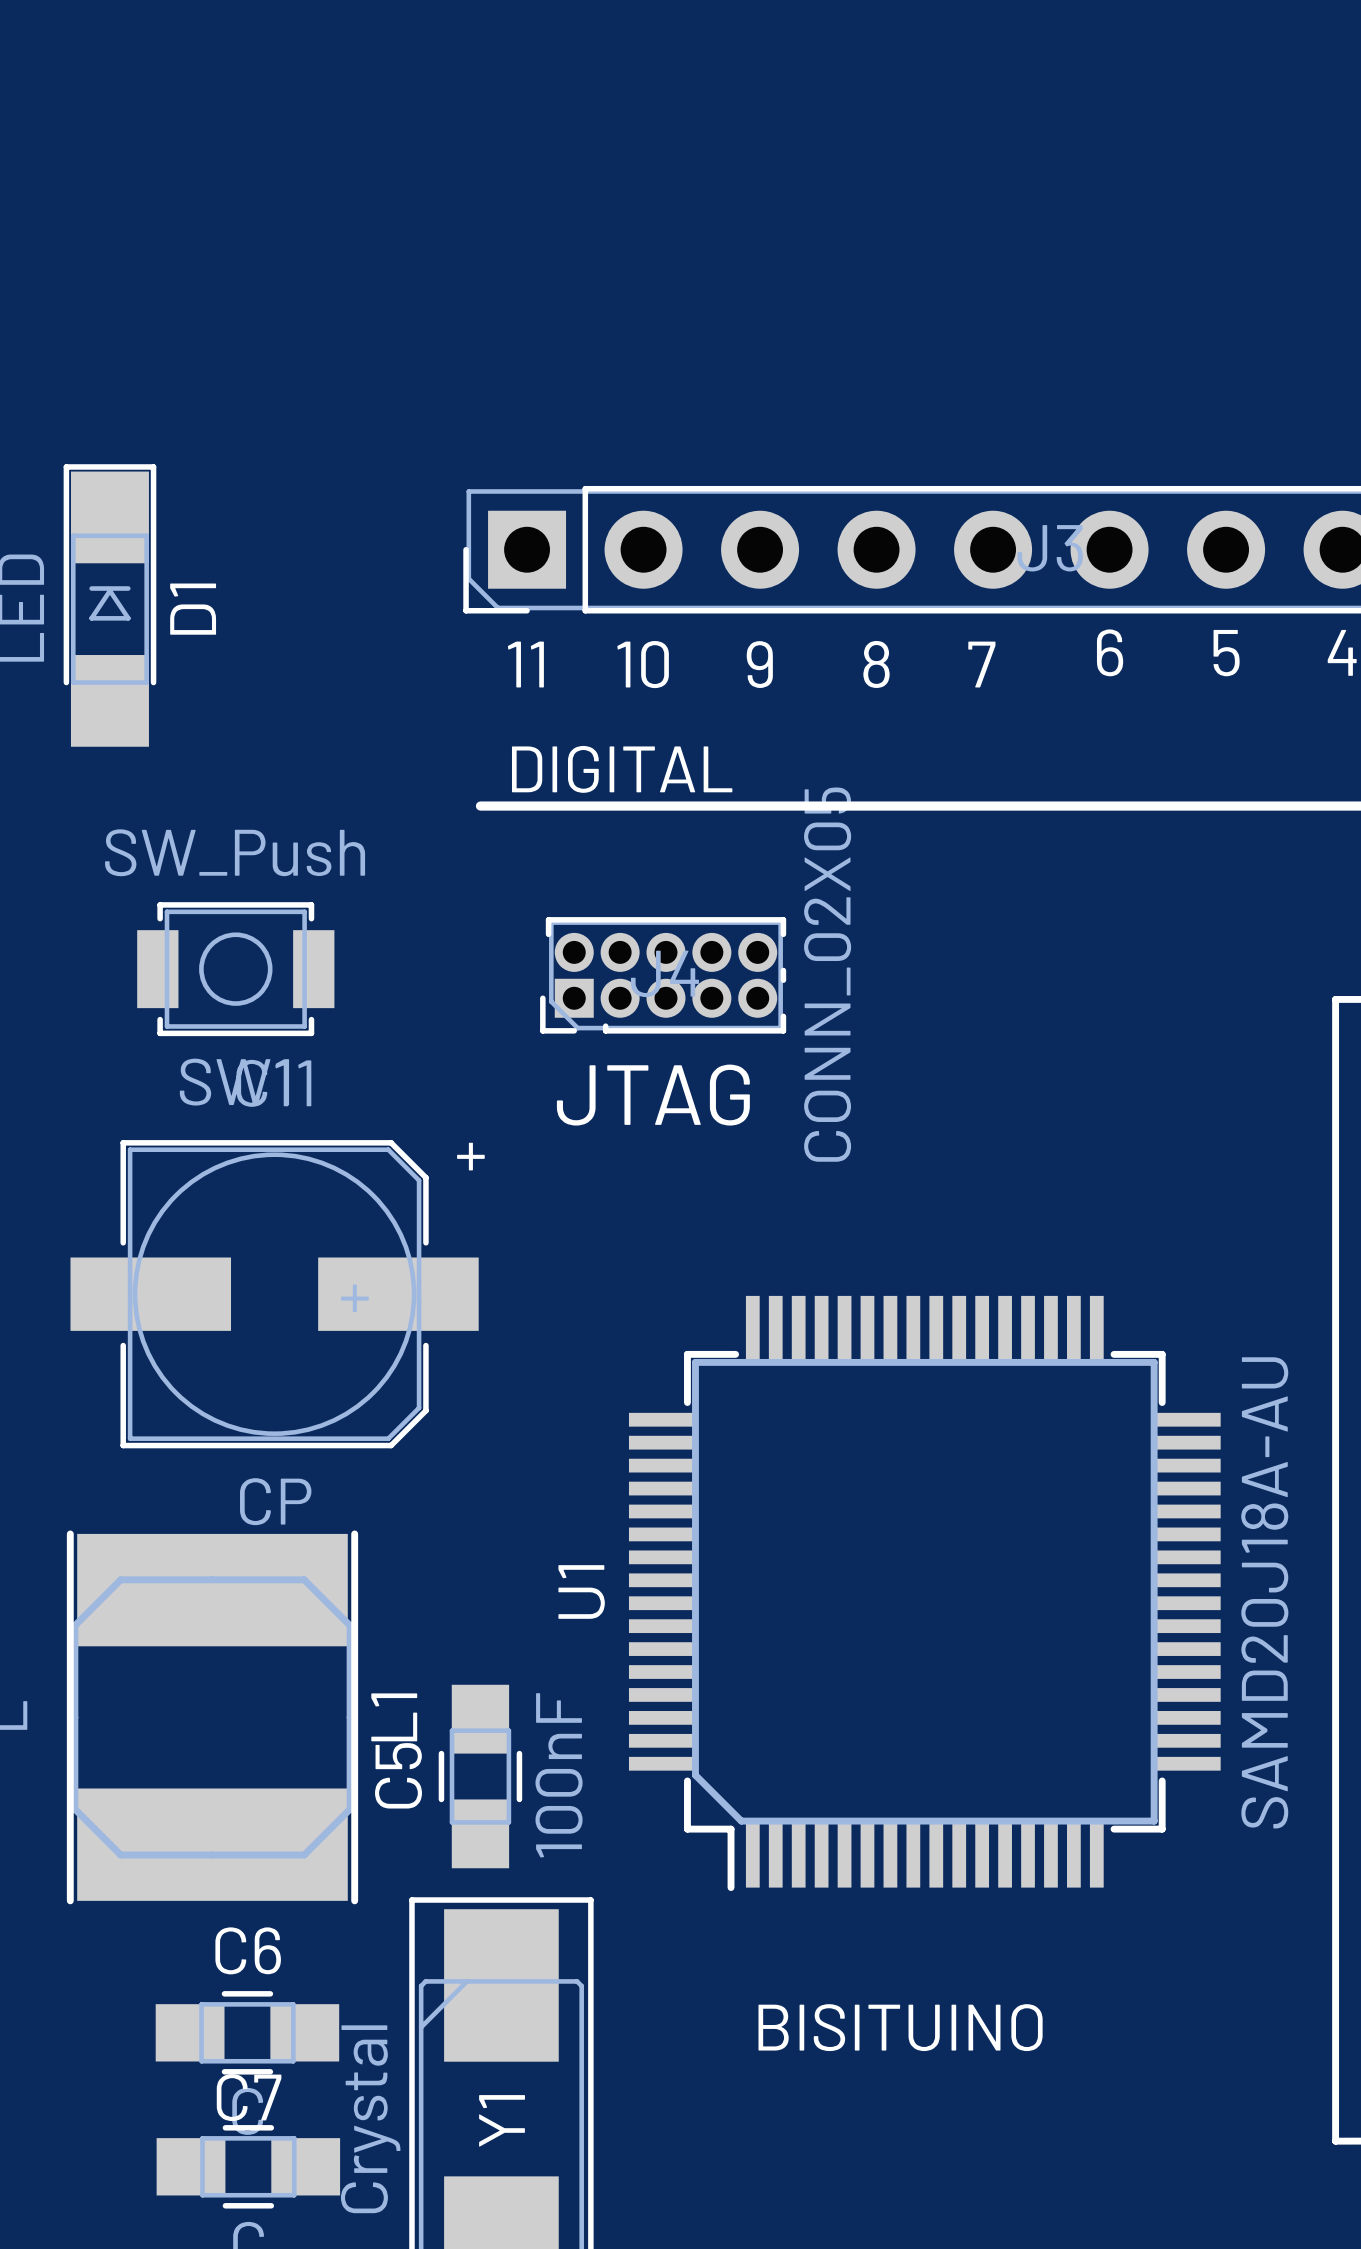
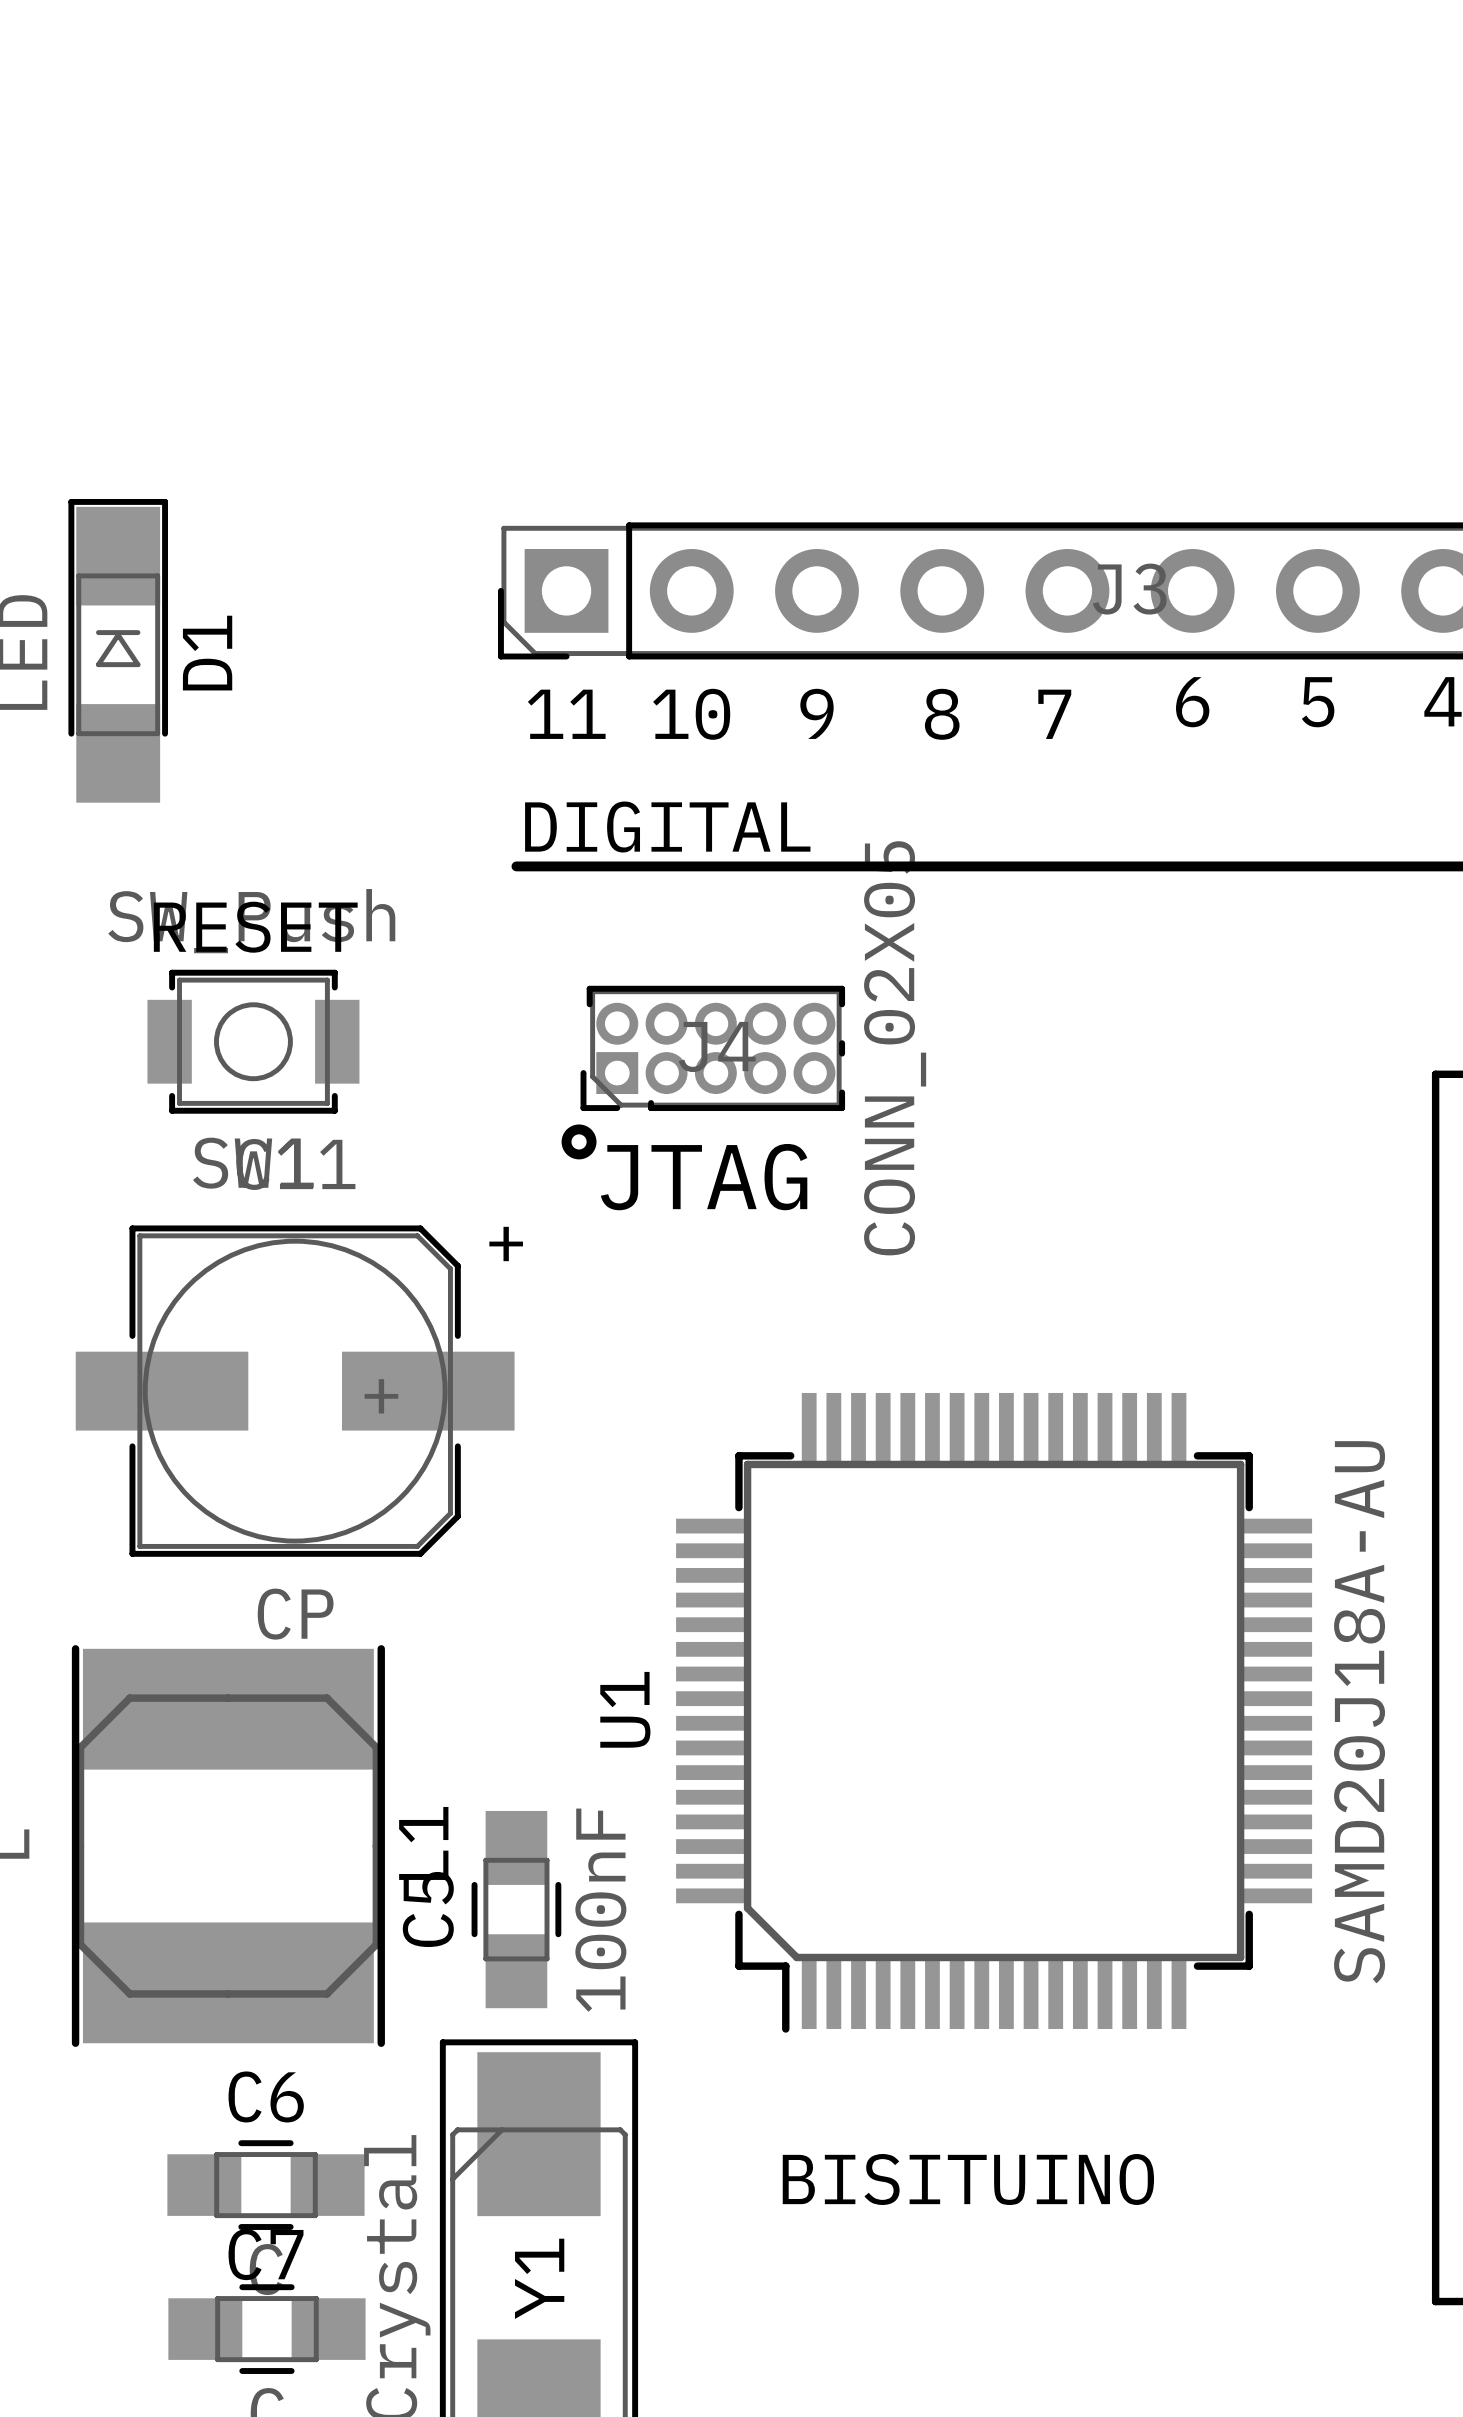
text: none -> RESET (255, 927)
drawing: none -> [561, 1124, 597, 1160]

